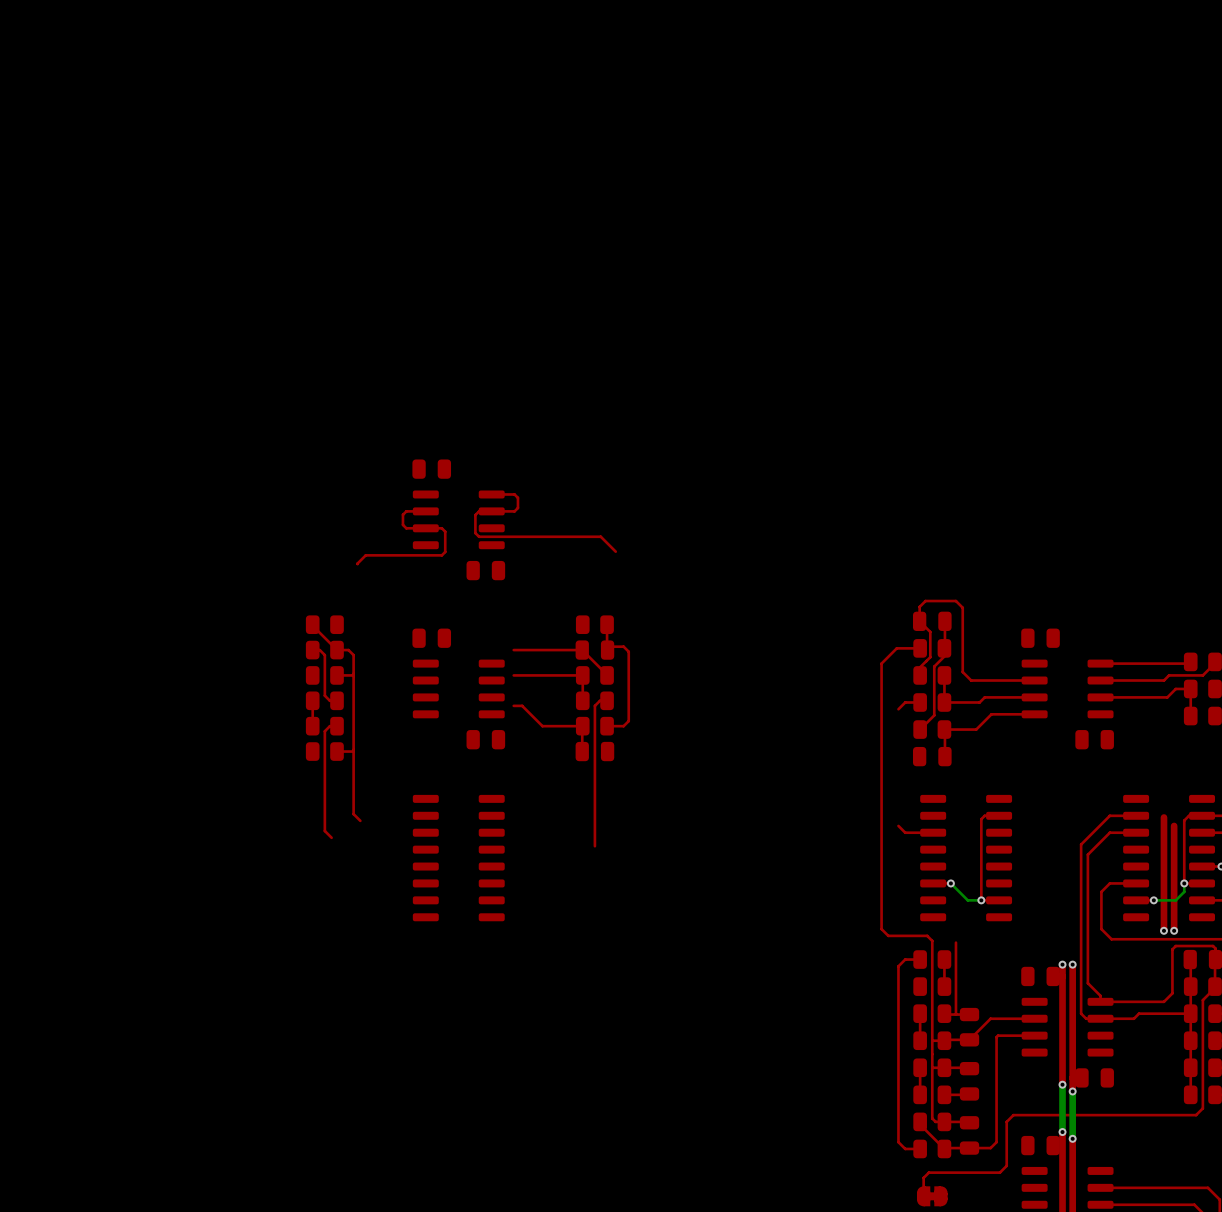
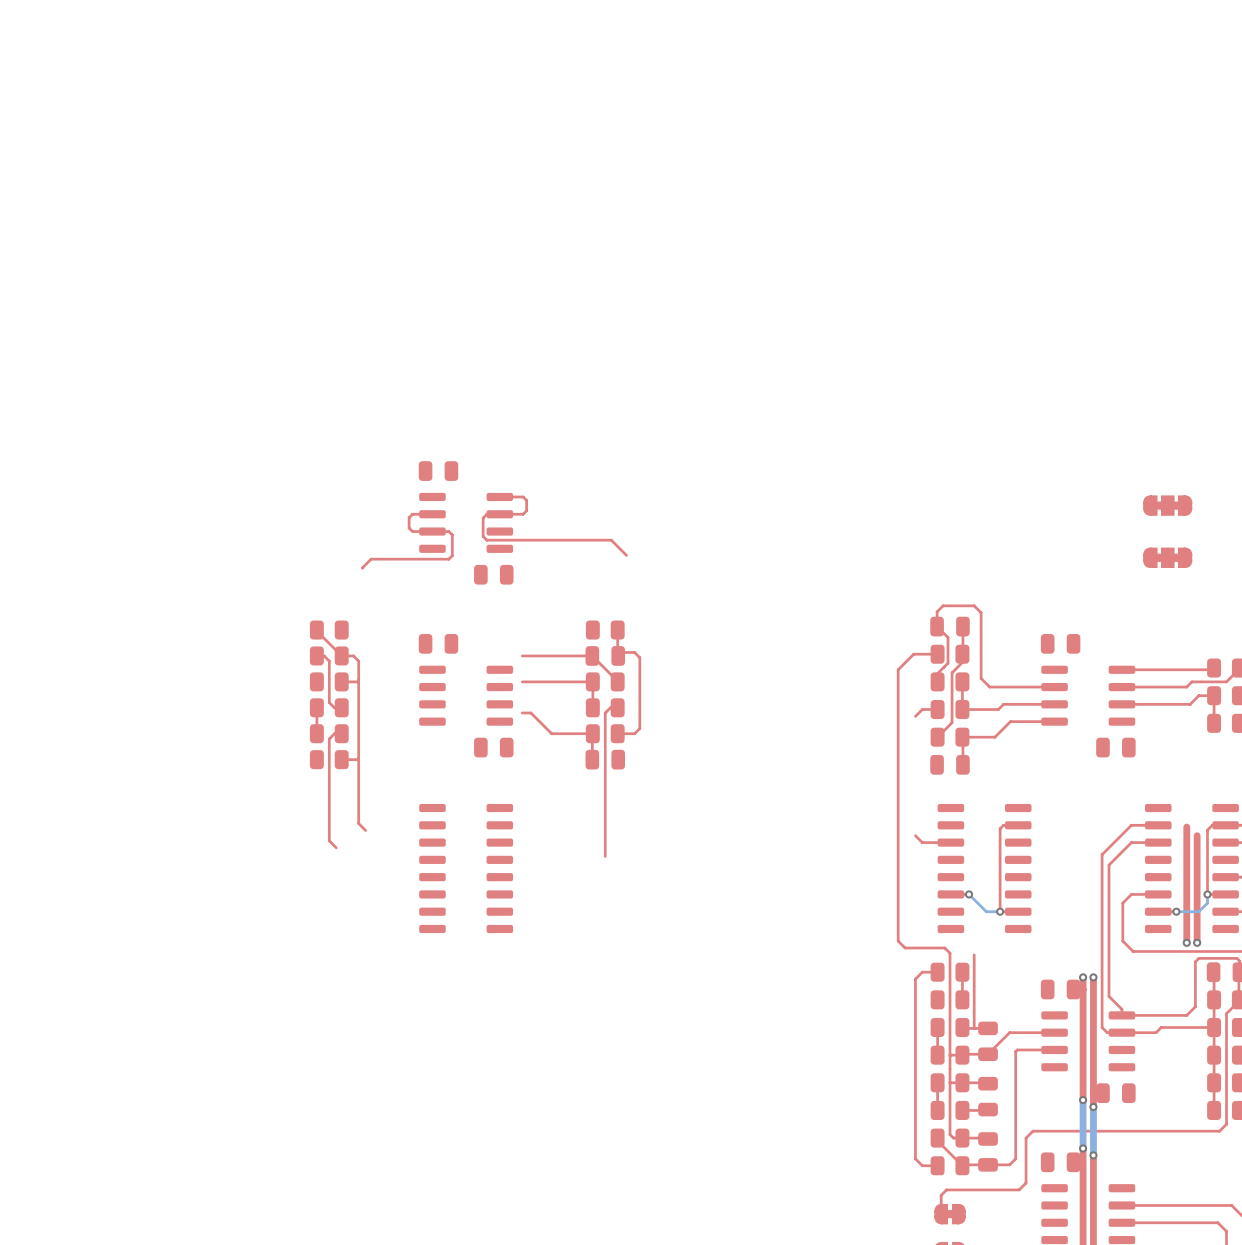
part: none -> (1167, 505)
part: none -> (1167, 557)

